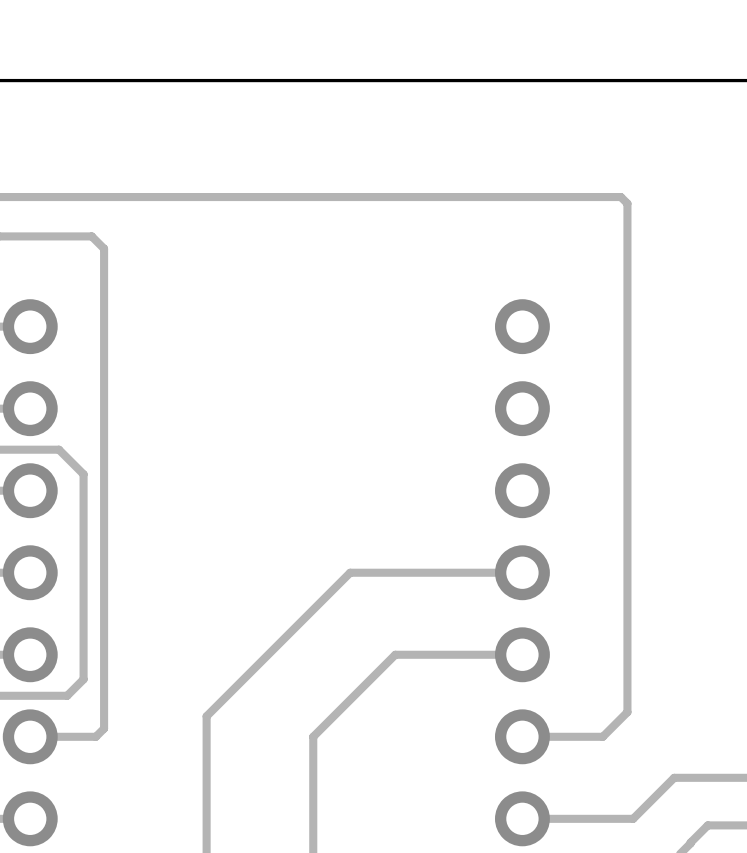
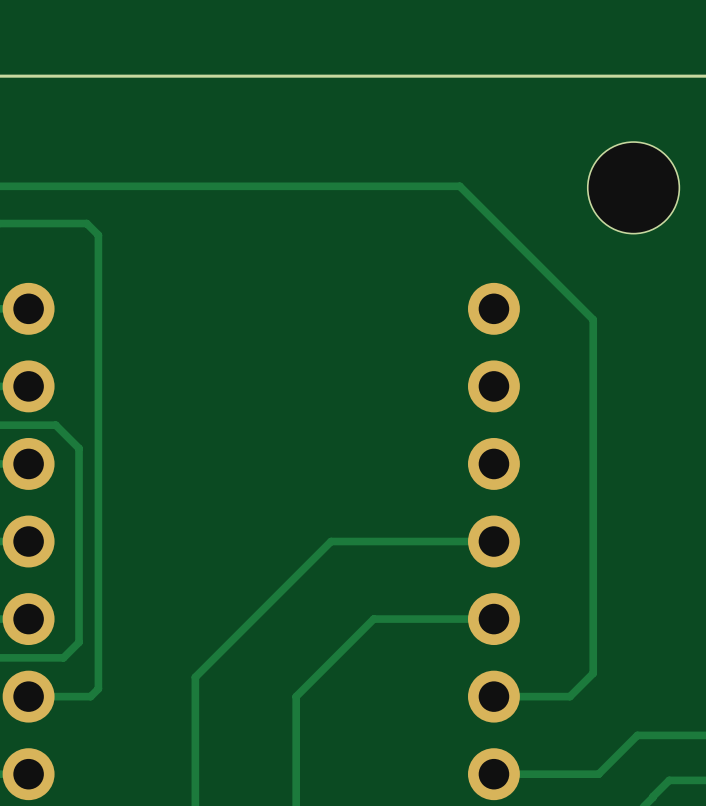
track: (486, 197) (620, 197) (627, 203) (627, 338) -> (459, 186) (593, 319)
part: none -> (633, 187)

